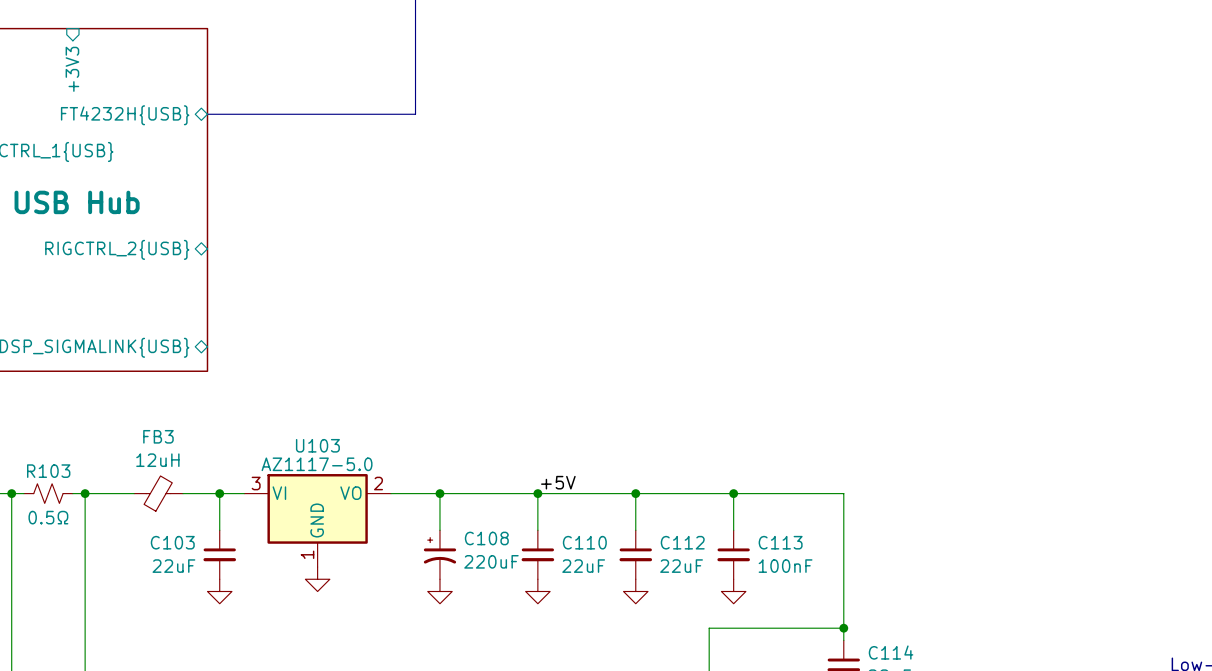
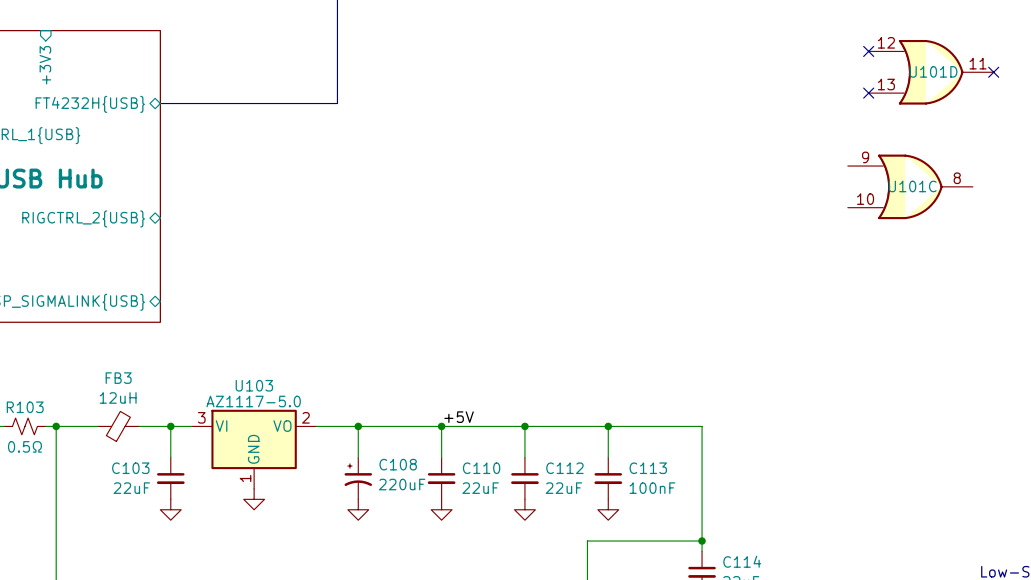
no-connect mark: none -> (868, 51)
U101D: none -> (931, 72)
no-connect mark: none -> (993, 72)
no-connect mark: none -> (868, 93)
U101C: none -> (910, 186)

